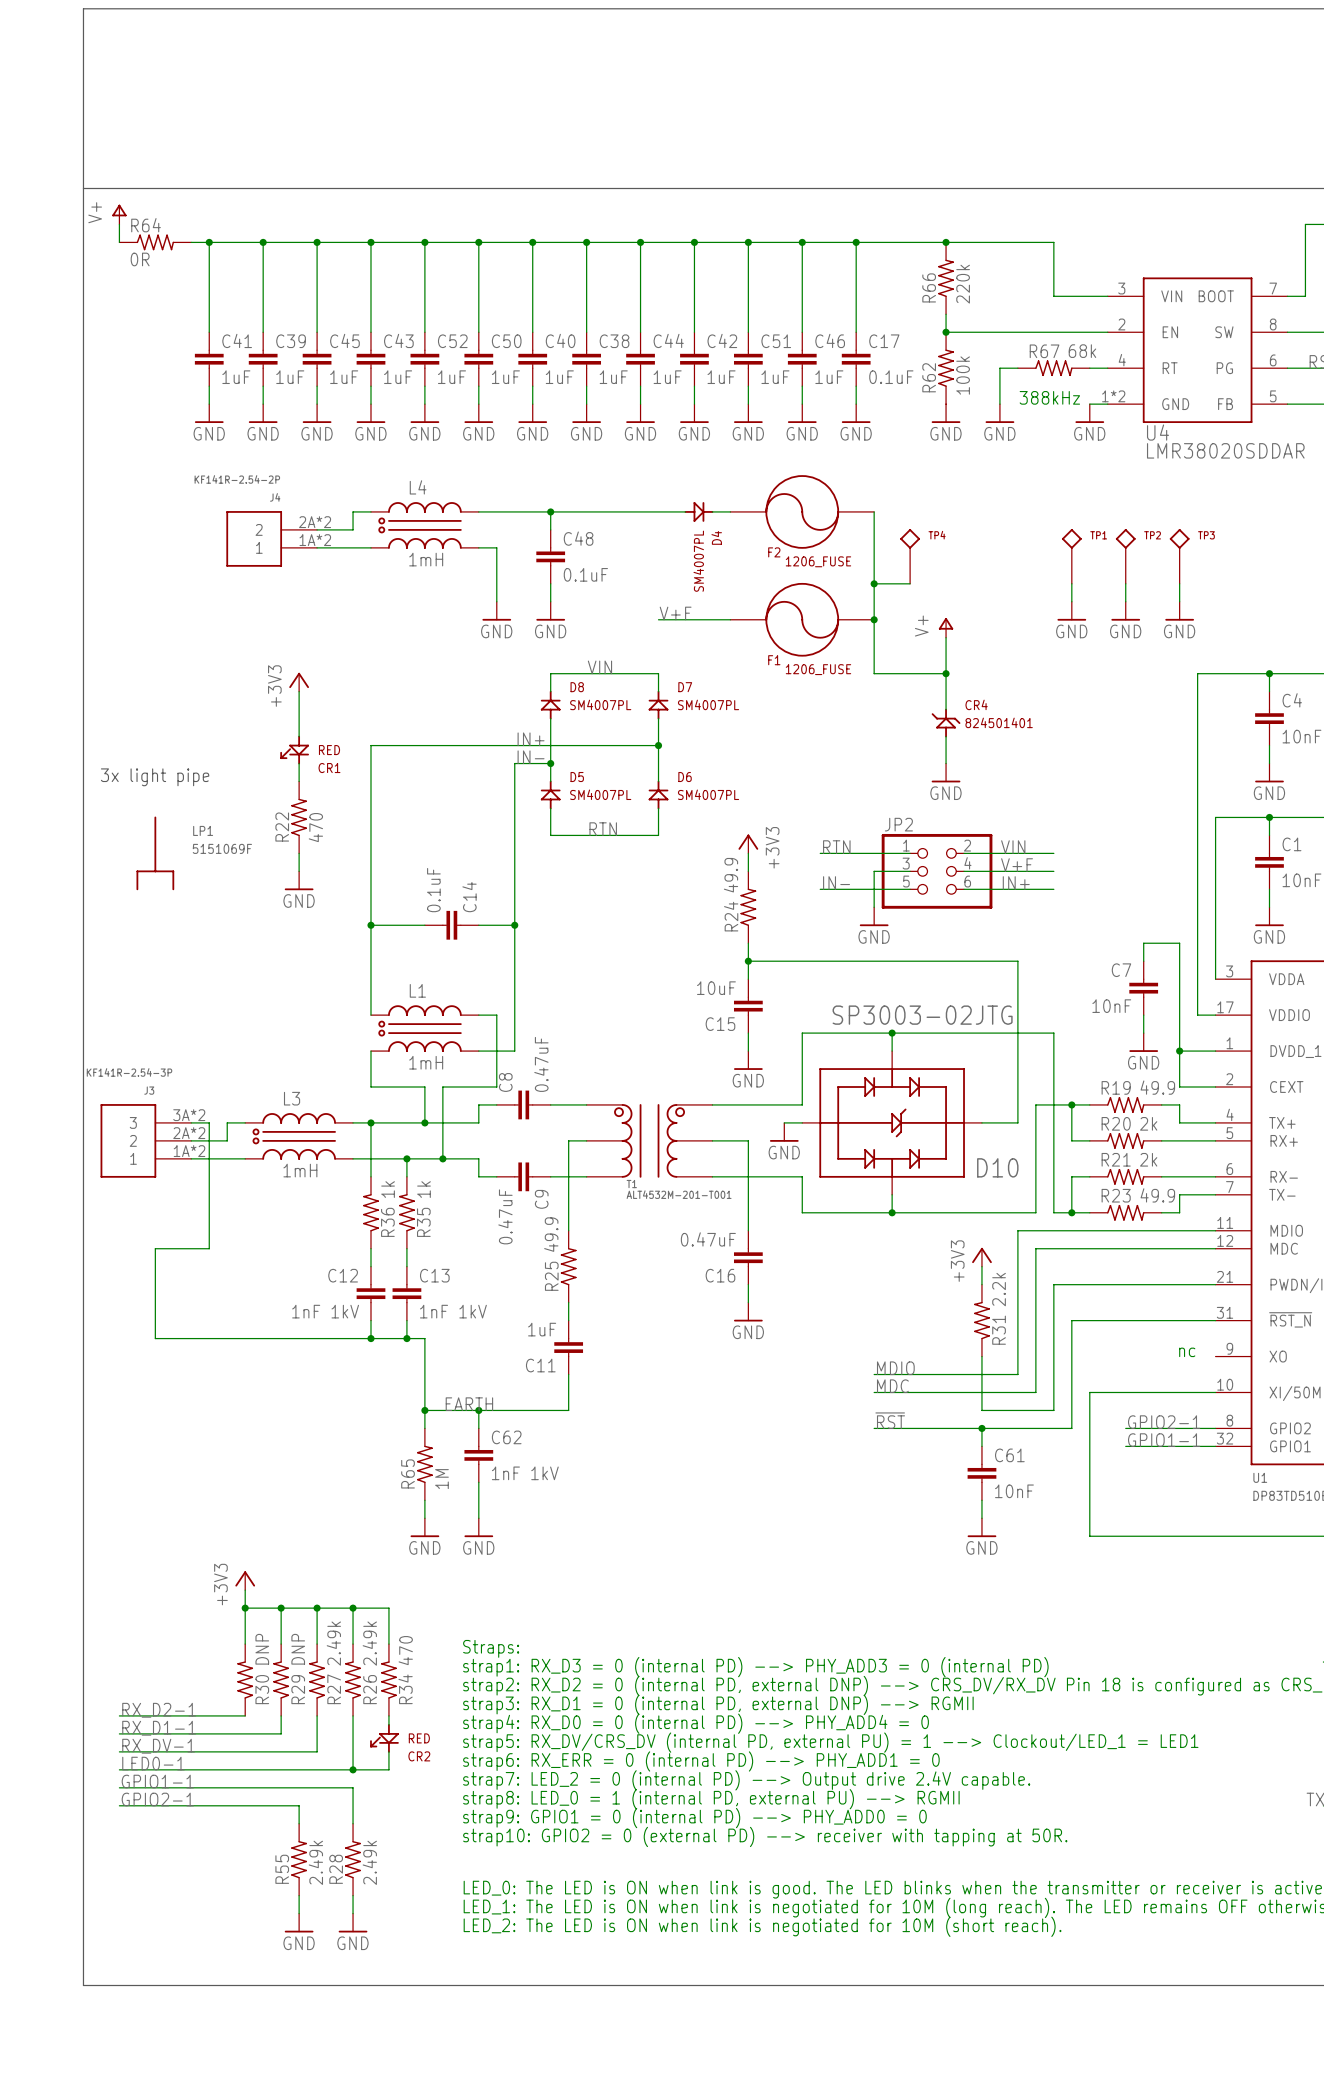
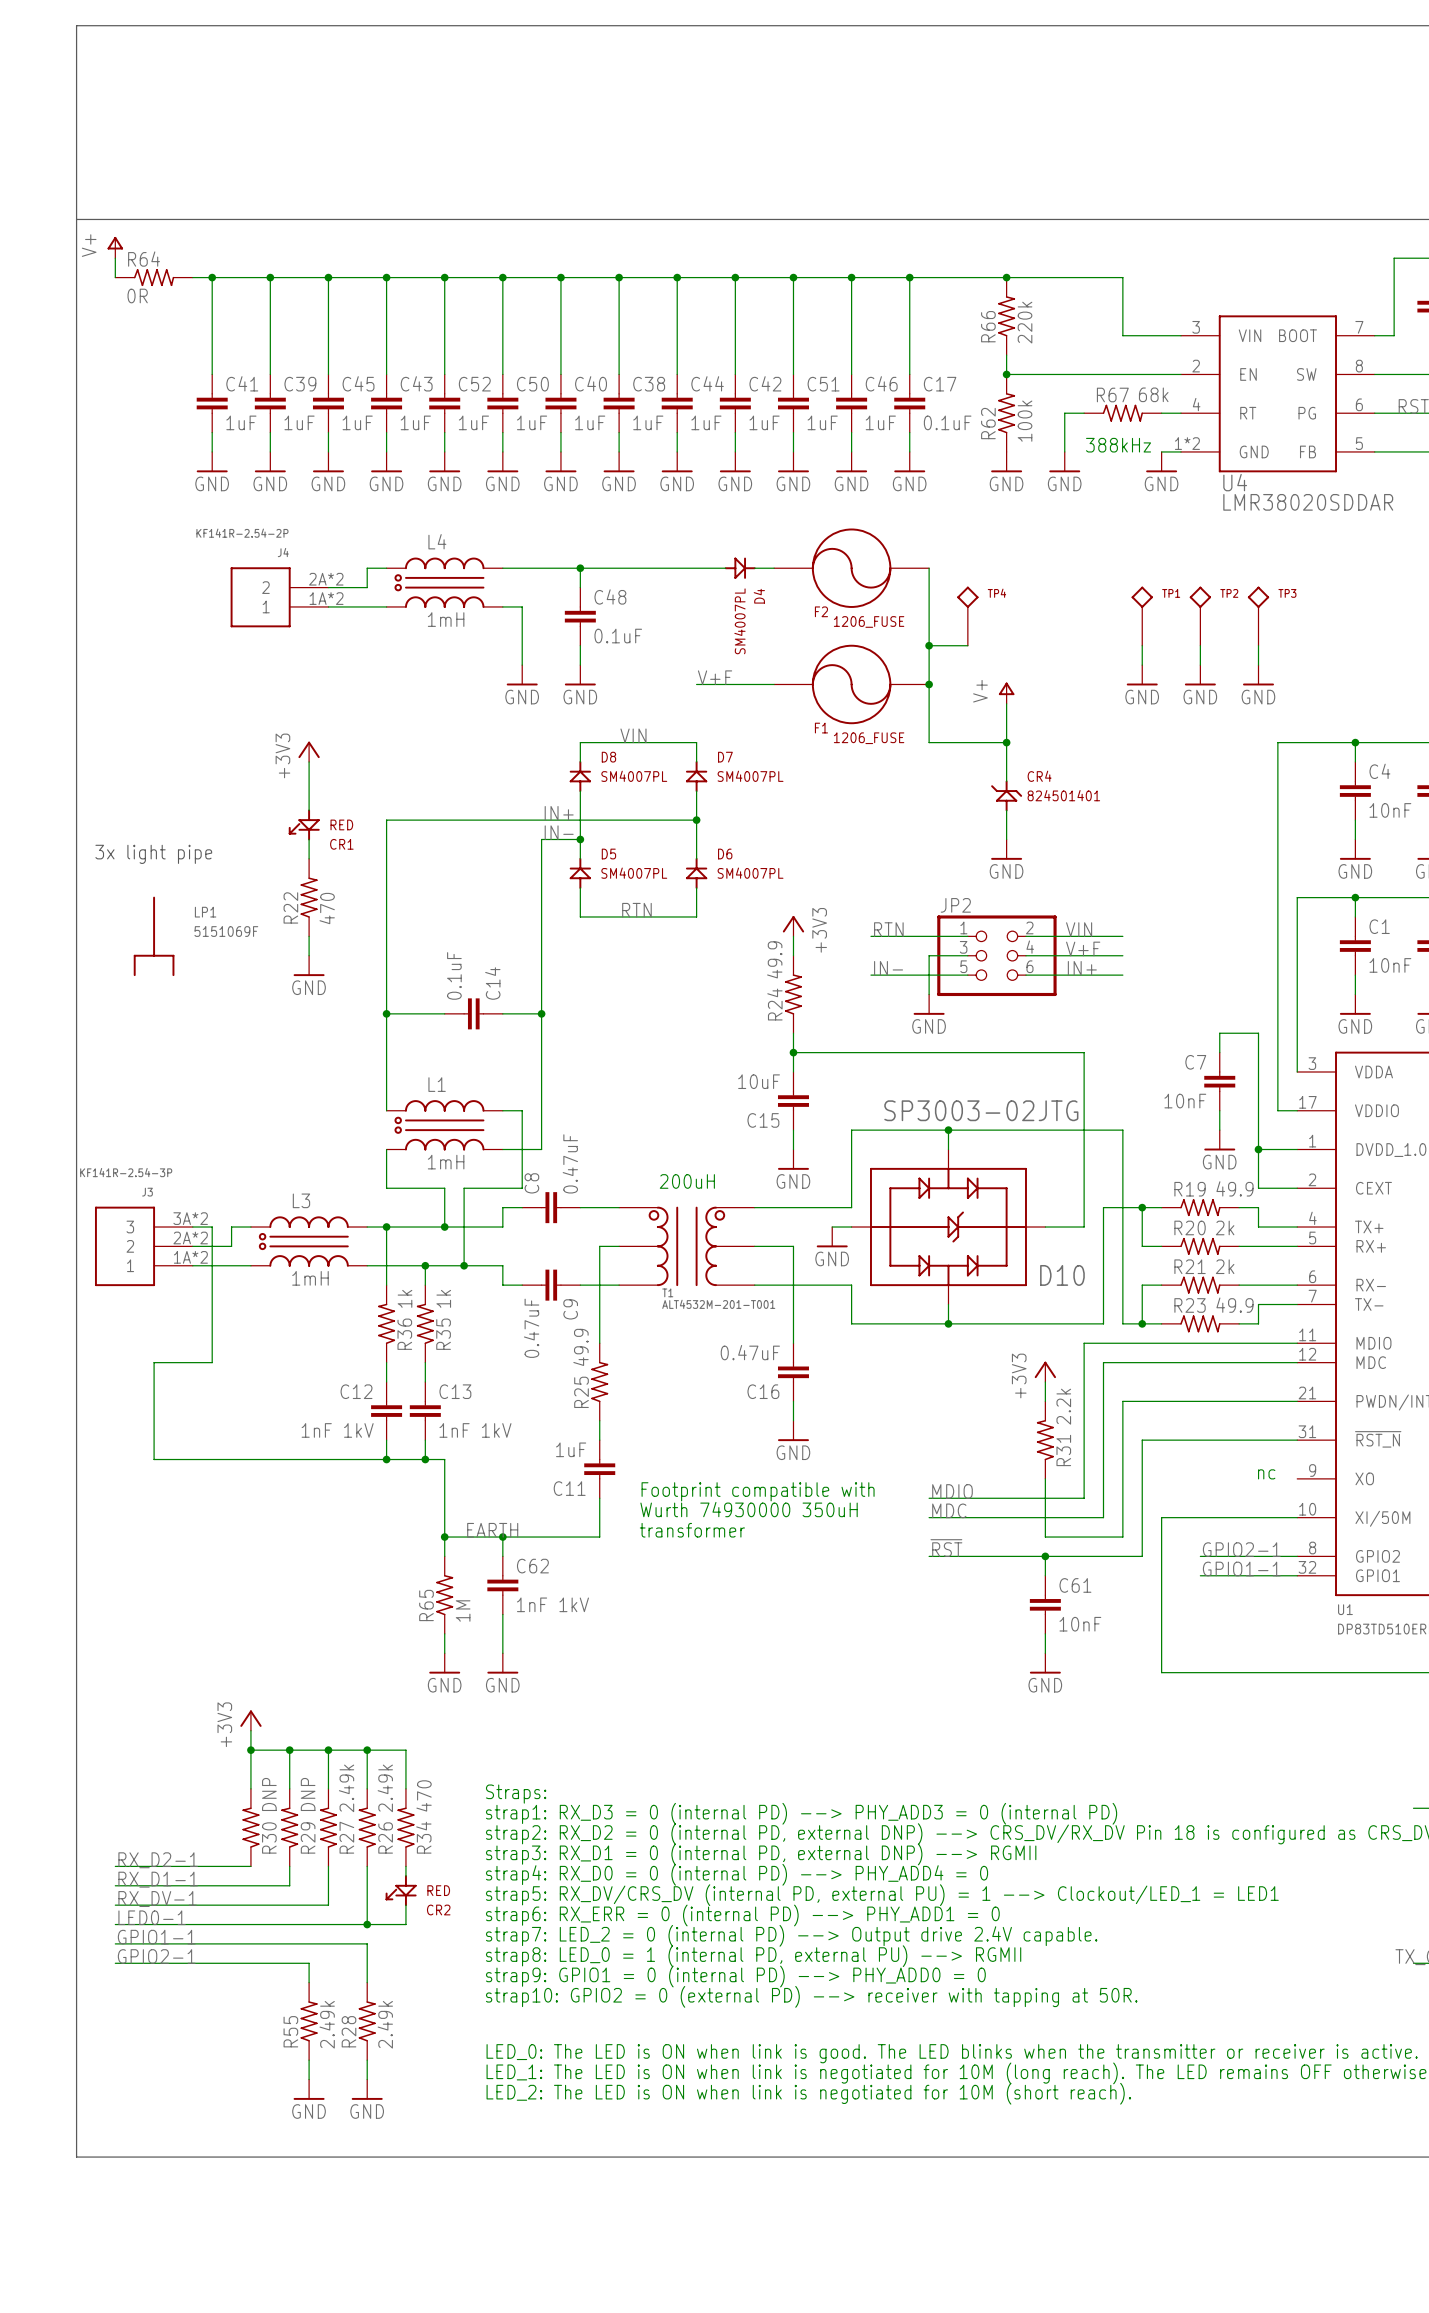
text: none -> 200uH (687, 1181)
text: none -> Footprint compatible with (758, 1491)
text: none -> Wurth 74930000 350uH (749, 1509)
text: none -> transformer (692, 1530)

